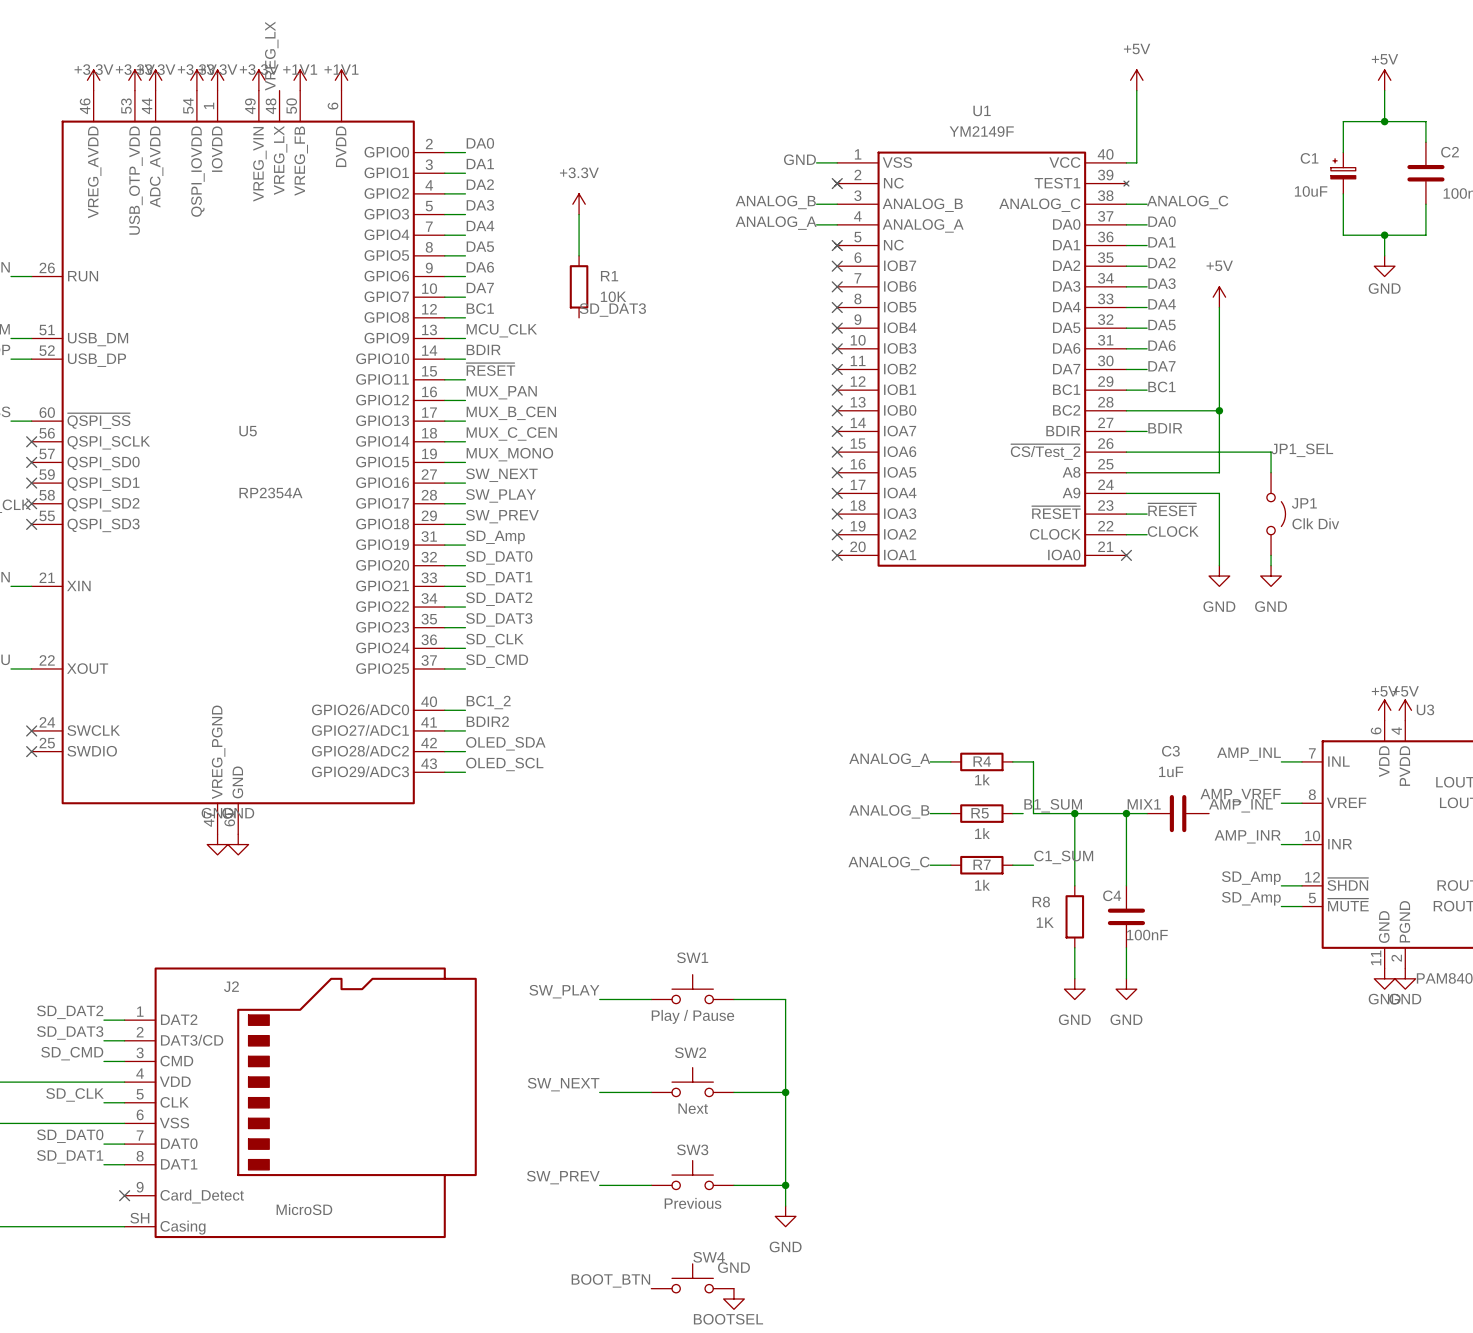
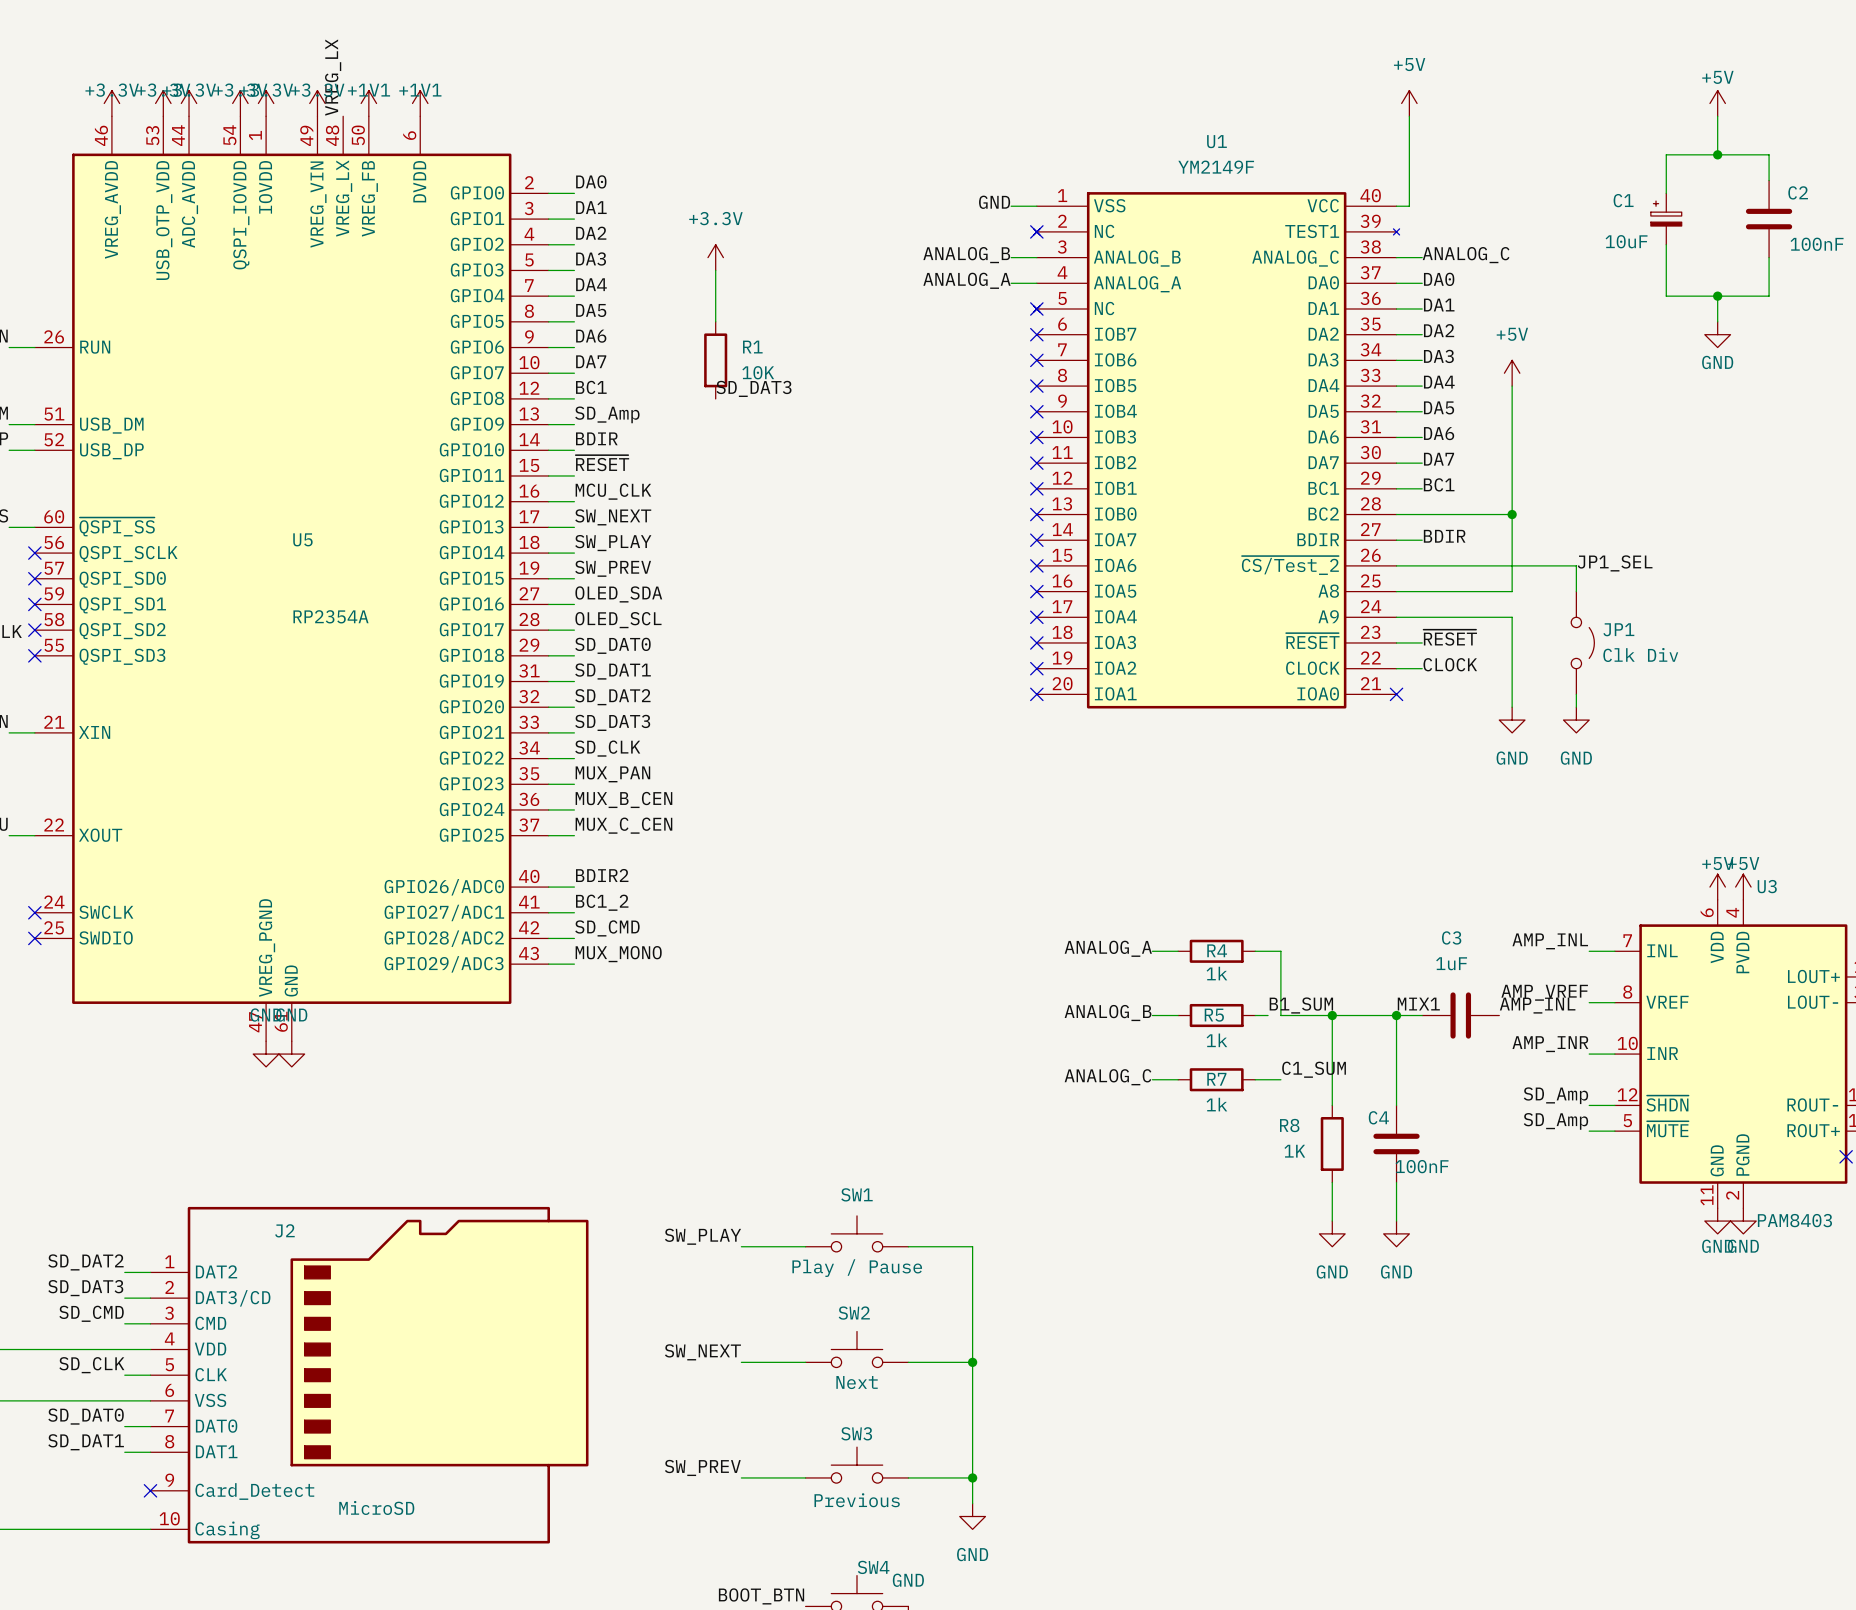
label: MCU_CLK (501, 330) -> SD_Amp (607, 414)
label: MUX_PAN (501, 392) -> MCU_CLK (613, 491)
label: MUX_B_CEN (511, 413) -> SW_NEXT (613, 517)
label: MUX_C_CEN (511, 433) -> SW_PLAY (613, 543)
label: MUX_MONO (509, 454) -> SW_PREV (613, 568)
label: SW_NEXT (501, 475) -> OLED_SDA (618, 594)
label: SW_PLAY (501, 495) -> OLED_SCL (618, 620)
label: SW_PREV (502, 516) -> SD_DAT0 (612, 645)
label: SD_Amp (495, 537) -> SD_DAT1 (613, 671)
label: SD_DAT0 (499, 557) -> SD_DAT2 (612, 697)
label: SD_DAT1 (499, 578) -> SD_DAT3 (612, 722)
label: SD_DAT2 (499, 599) -> SD_CLK (607, 748)
label: SD_DAT3 (499, 619) -> MUX_PAN (612, 774)
label: SD_CLK (494, 640) -> MUX_B_CEN (623, 799)
label: SD_CMD (497, 661) -> MUX_C_CEN (623, 825)
label: BC1_2 (488, 702) -> BDIR2 (602, 875)
label: BDIR2 (487, 721) -> BC1_2 (602, 902)
label: OLED_SDA (505, 743) -> SD_CMD (607, 928)
label: OLED_SCL (504, 764) -> MUX_MONO (618, 954)
J2 pin number: SH (139, 1218) -> 10 (169, 1518)

